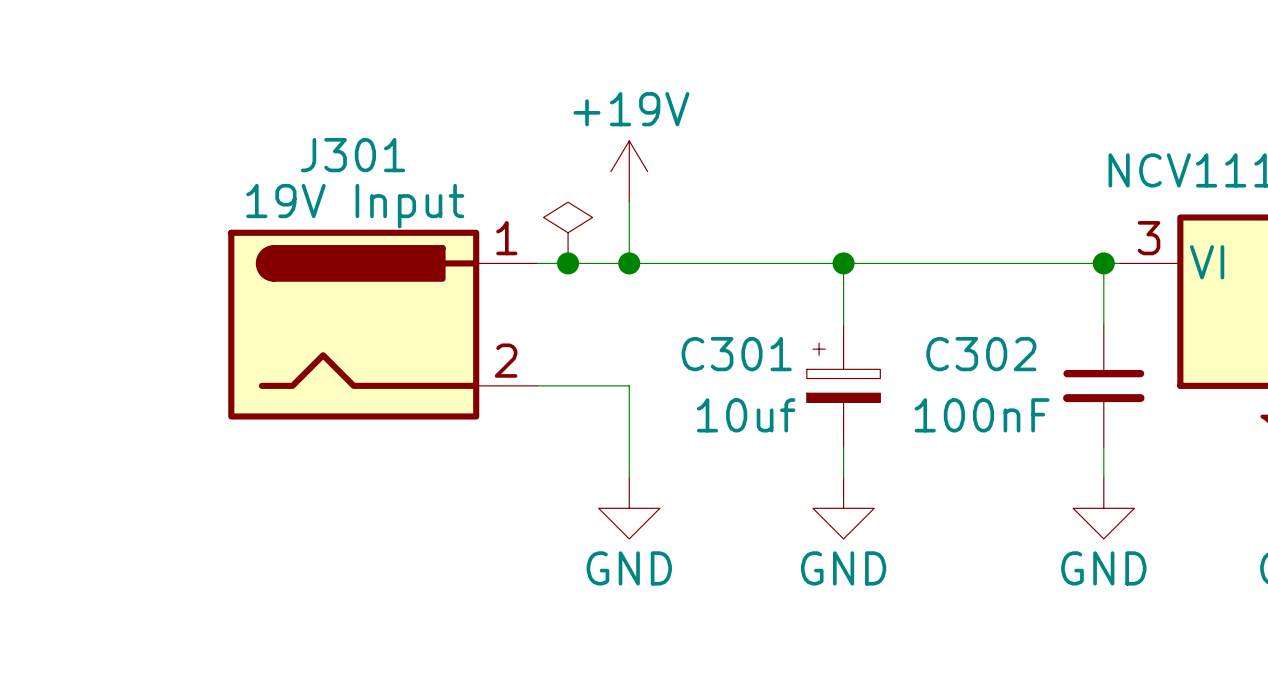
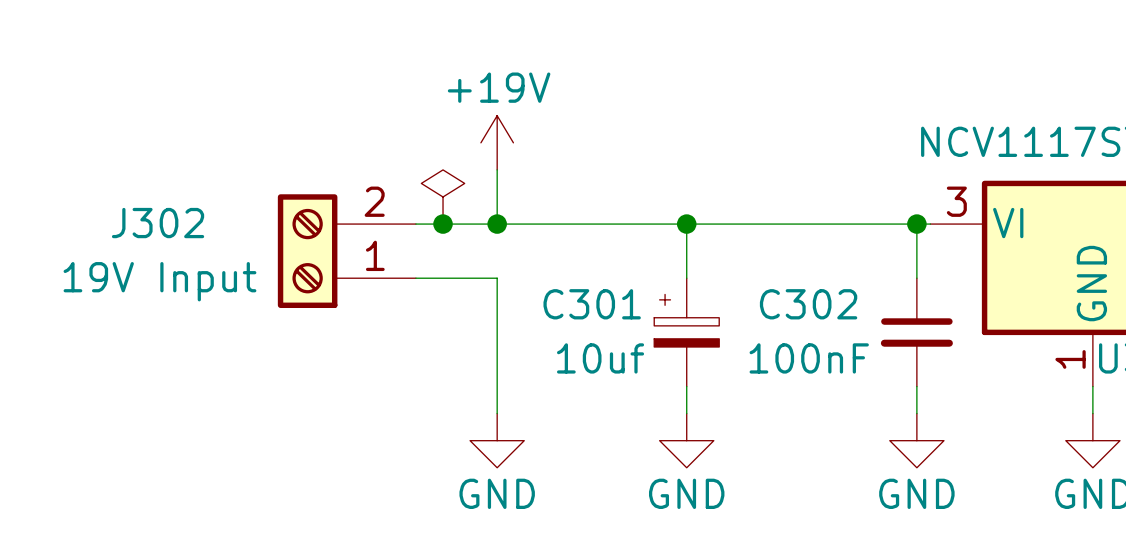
J302: none -> 19V Input (346, 251)
J301: 19V Input (382, 324) -> none
wire: (537, 385) (629, 385) -> (415, 278) (497, 278) (497, 332)

